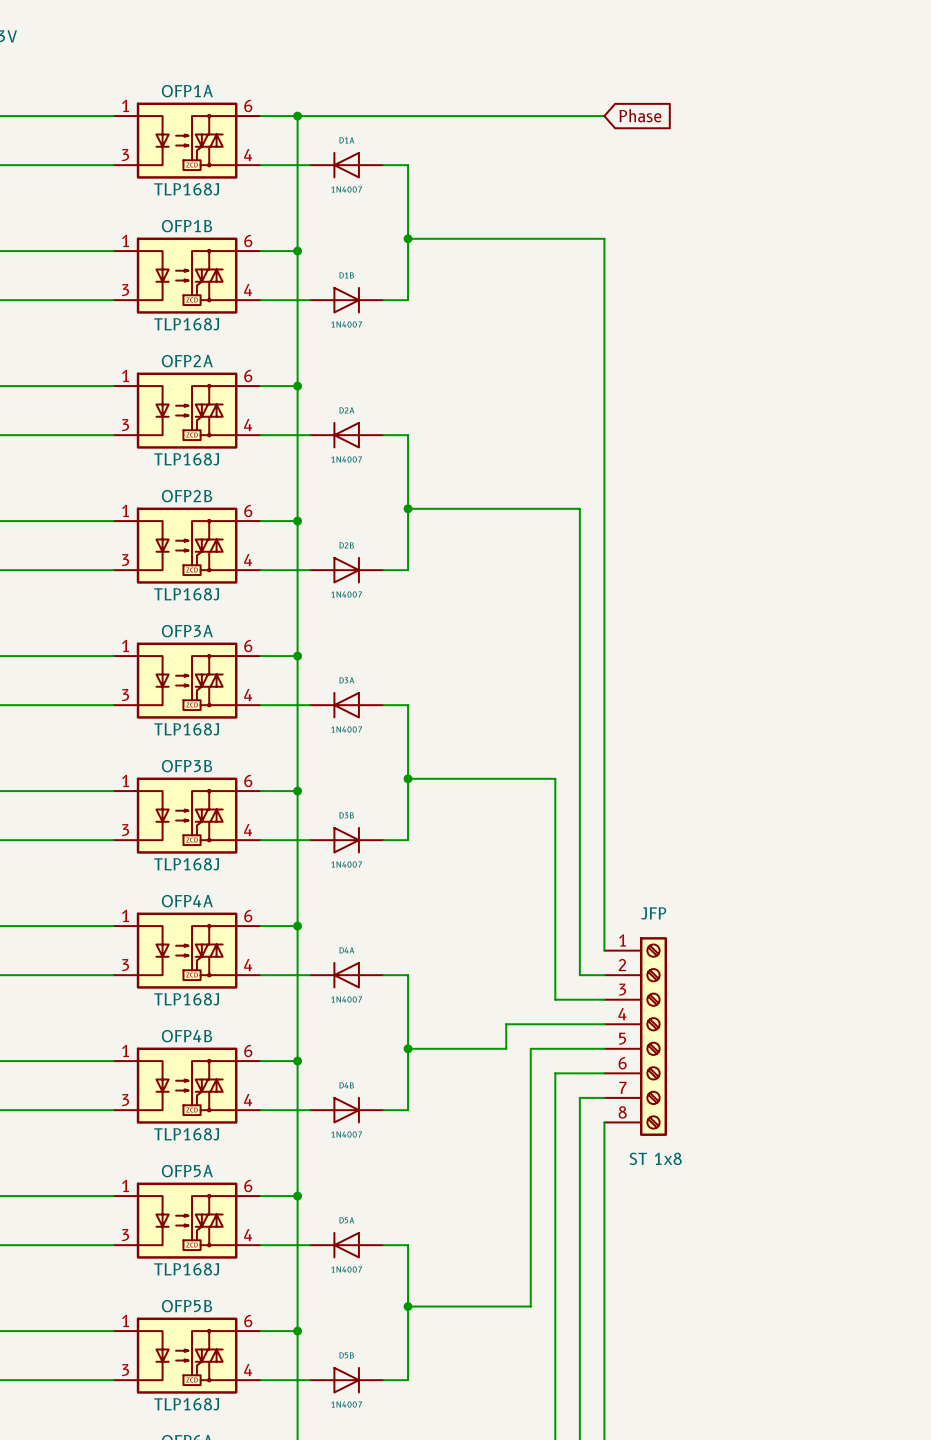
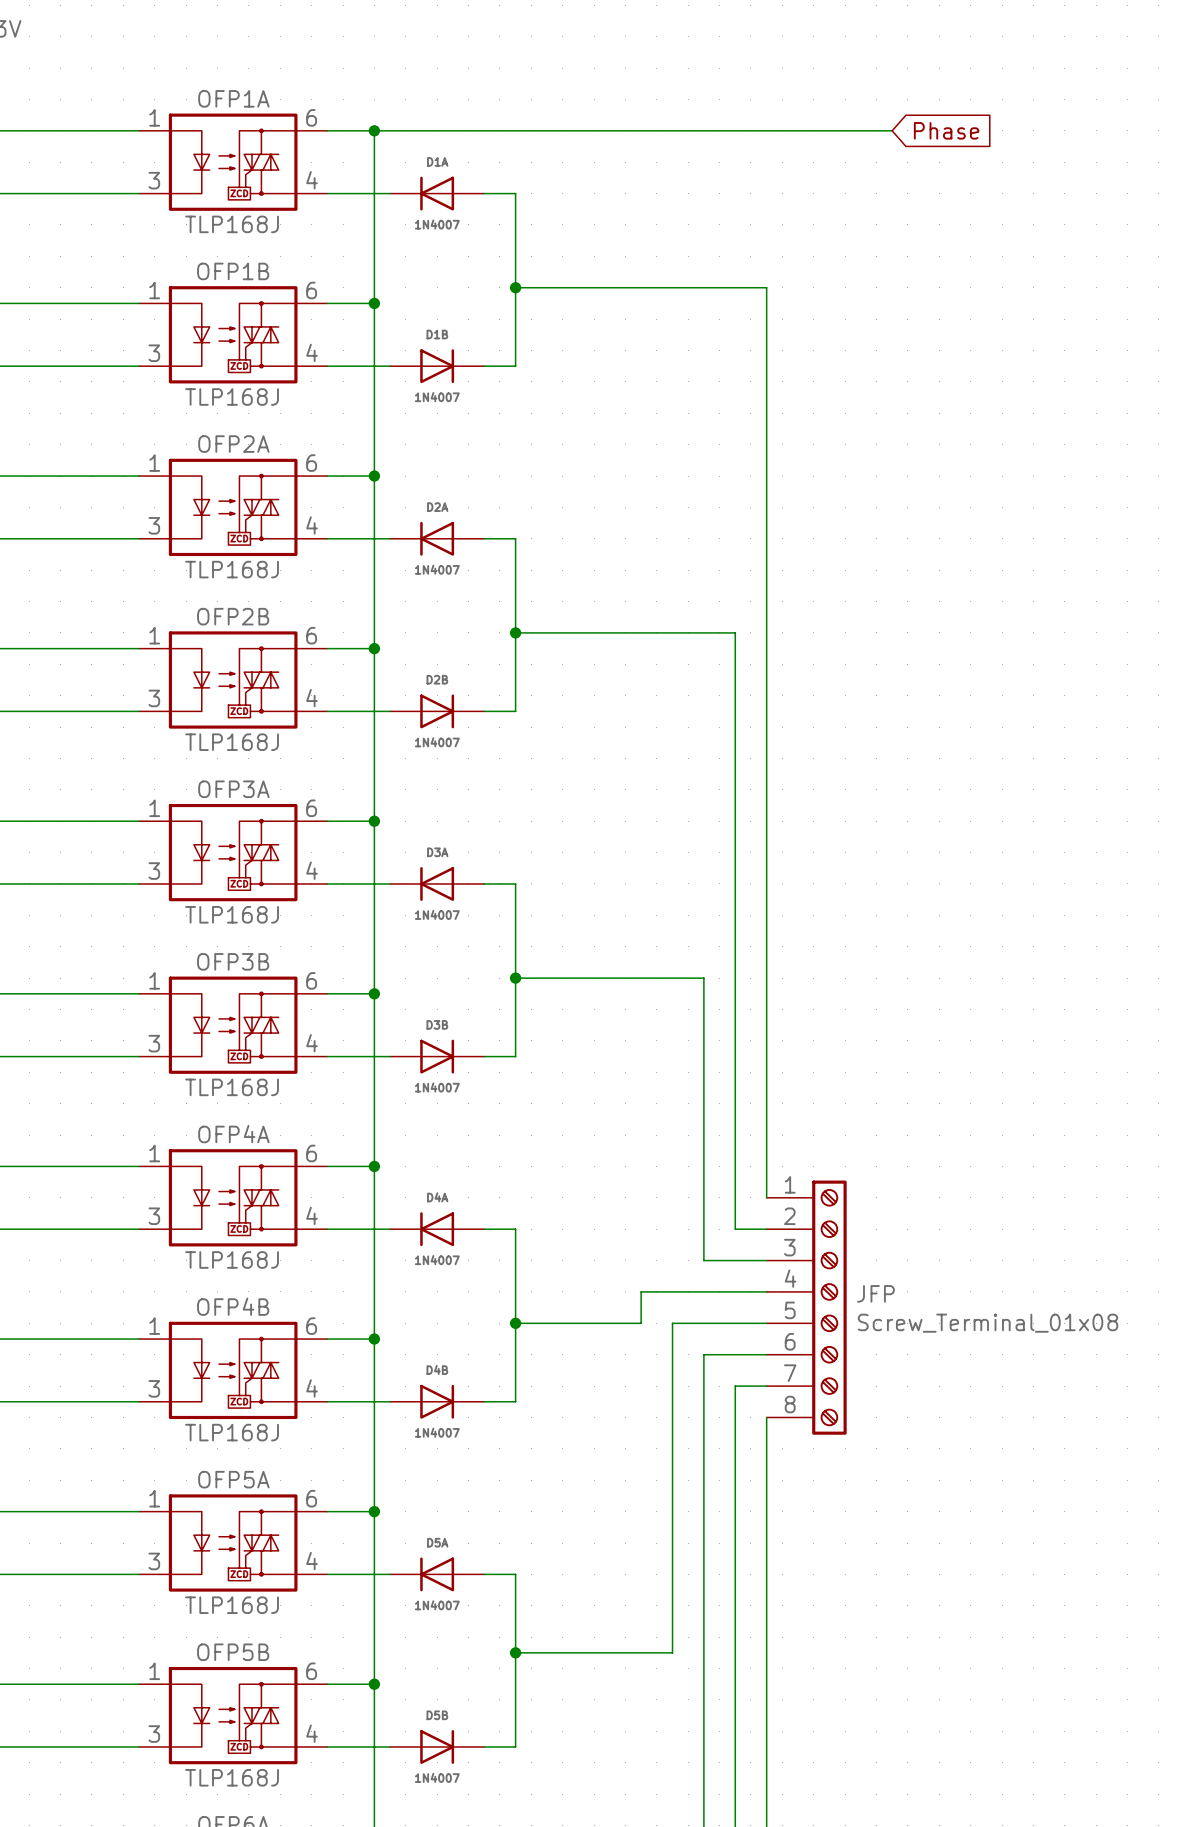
global label position: Phase (640, 115) -> Phase (946, 130)
wire: none -> (766, 130) (892, 130)
JFP name position: JFP (653, 913) -> JFP (875, 1293)
JFP value: ST 1x8 (655, 1158) -> Screw_Terminal_01x08 (988, 1323)

